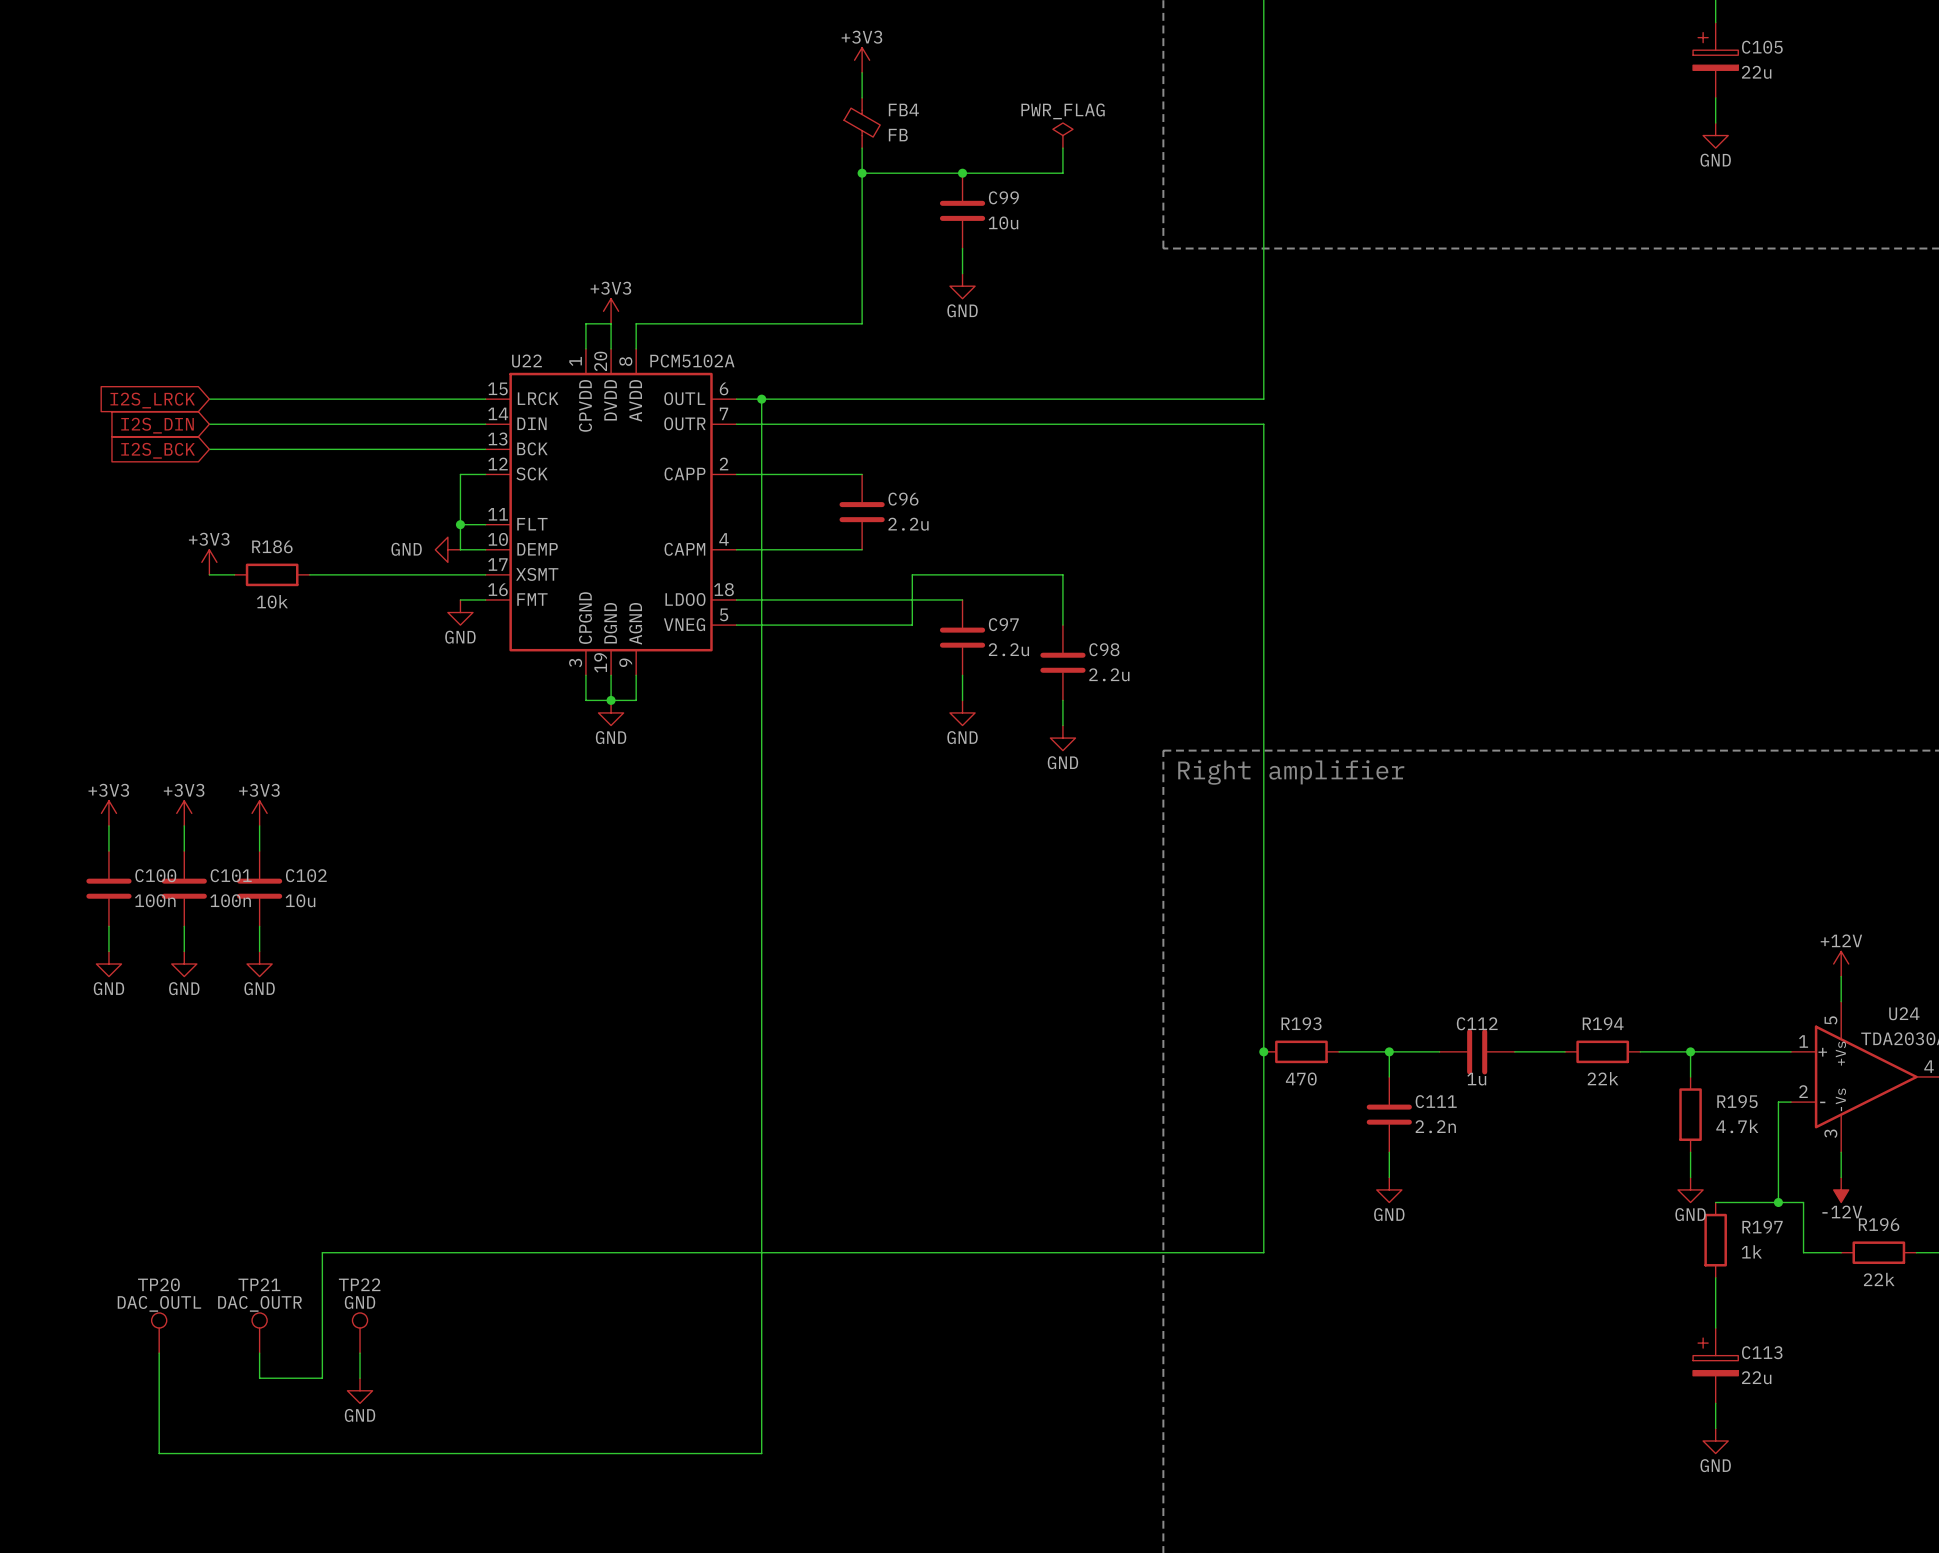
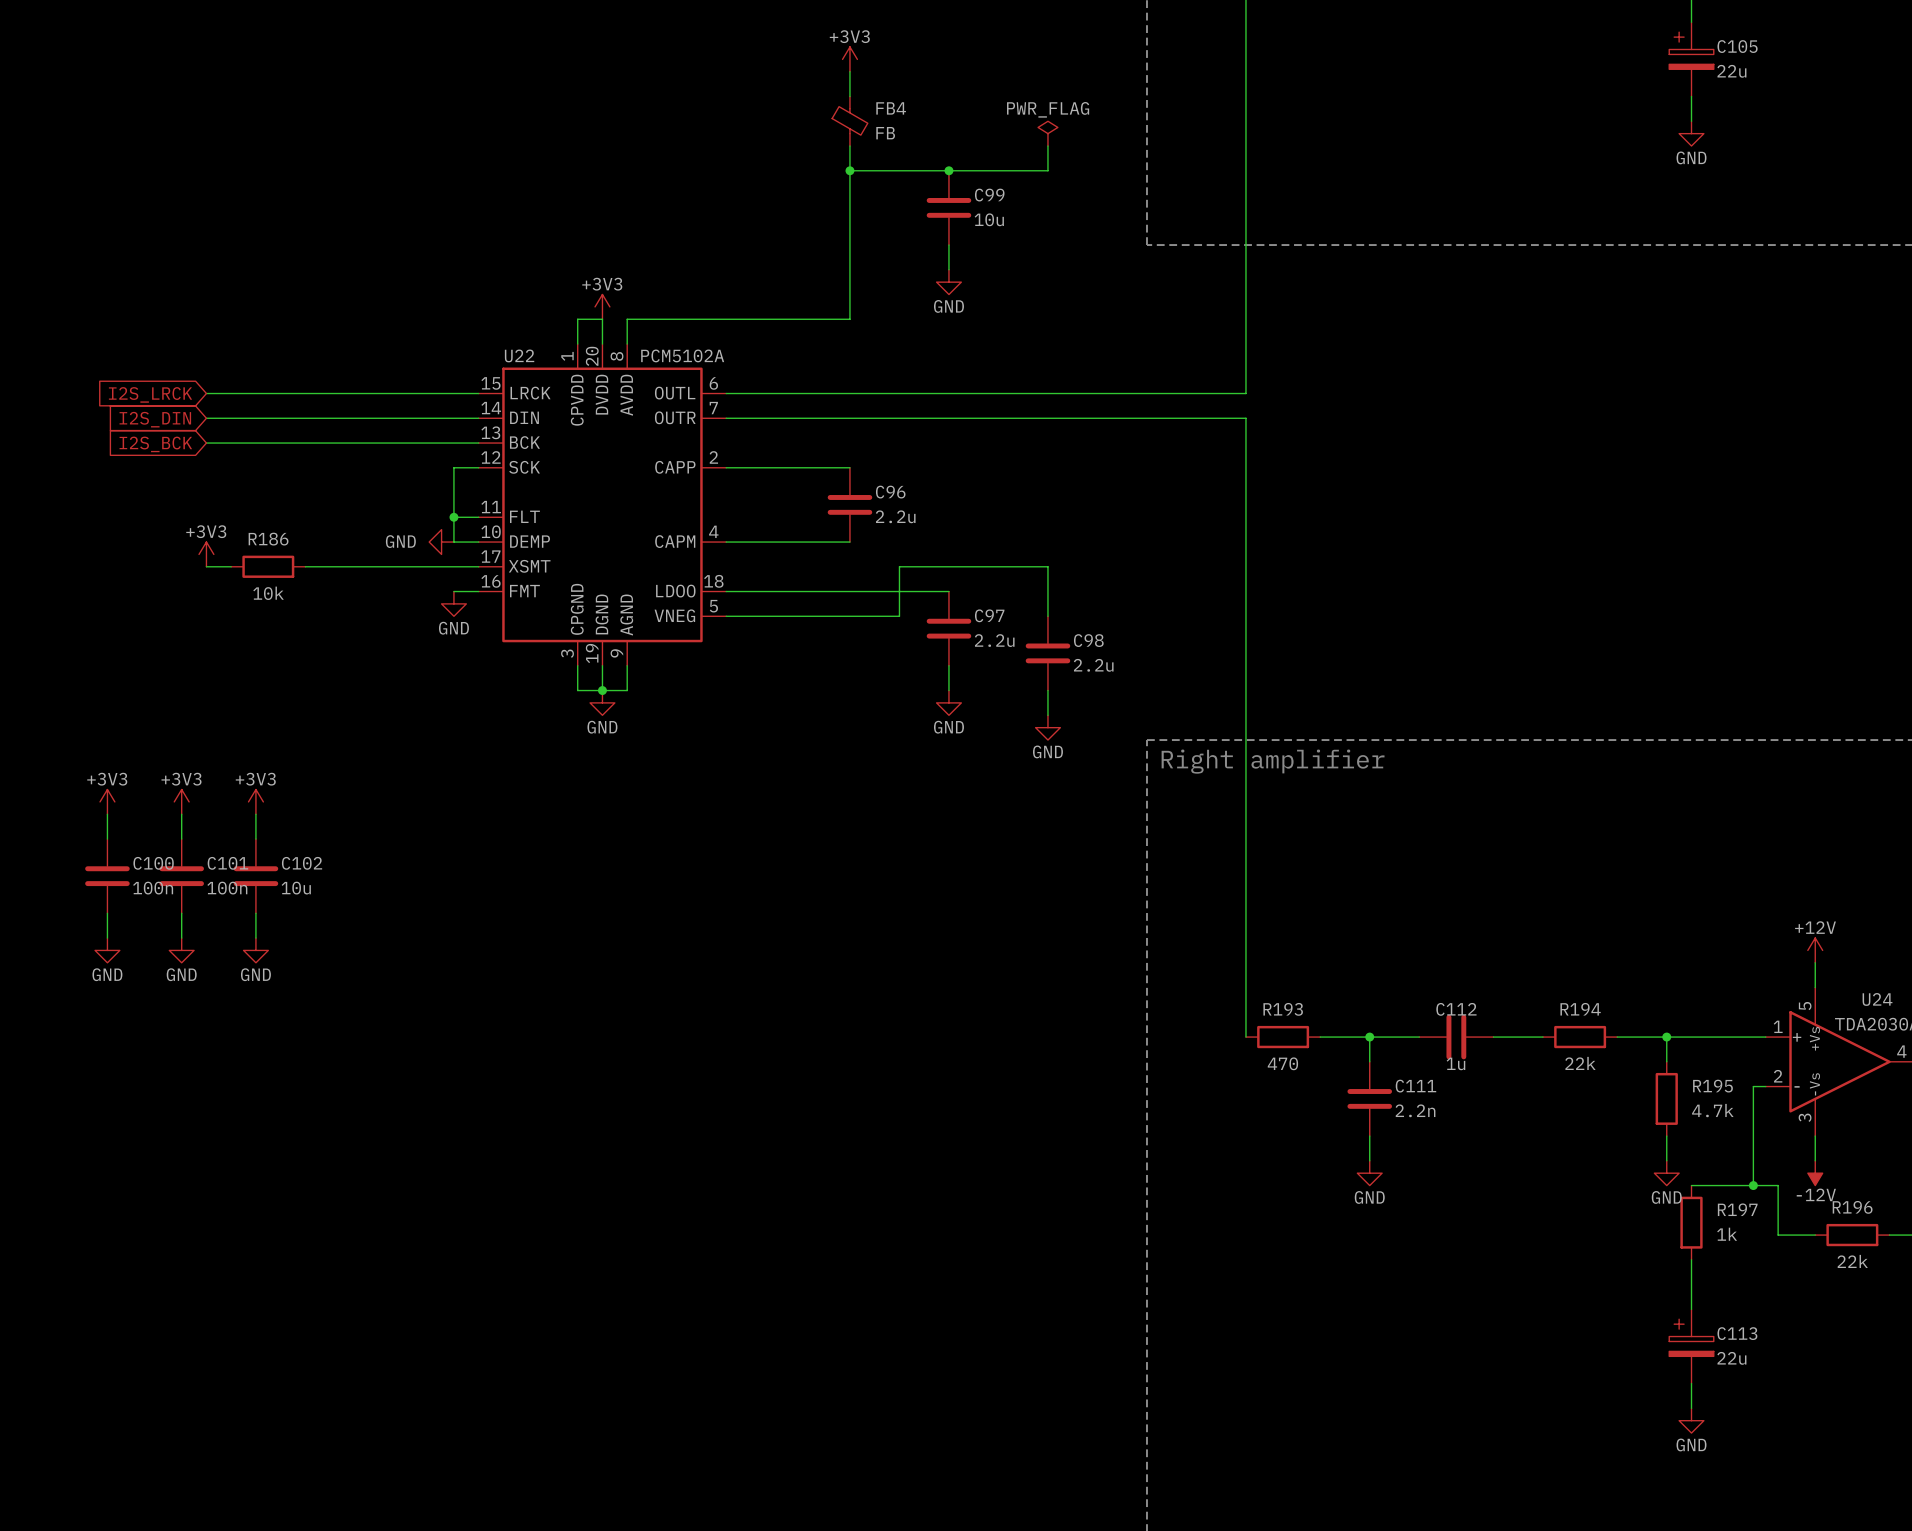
wire: (761, 399) (761, 1453) (159, 1453) (159, 1353) -> none
junction: (761, 399) -> none
wire: (1263, 1051) (1263, 1252) (322, 1252) (322, 1378) (259, 1378) (259, 1353) -> none
junction: (1263, 1051) -> none
TP20: DAC_OUTL (159, 1333) -> none
TP21: DAC_OUTR (259, 1333) -> none
TP22: GND (360, 1333) -> none
wire: (360, 1353) (360, 1378) -> none
power symbol: GND (360, 1390) -> none

